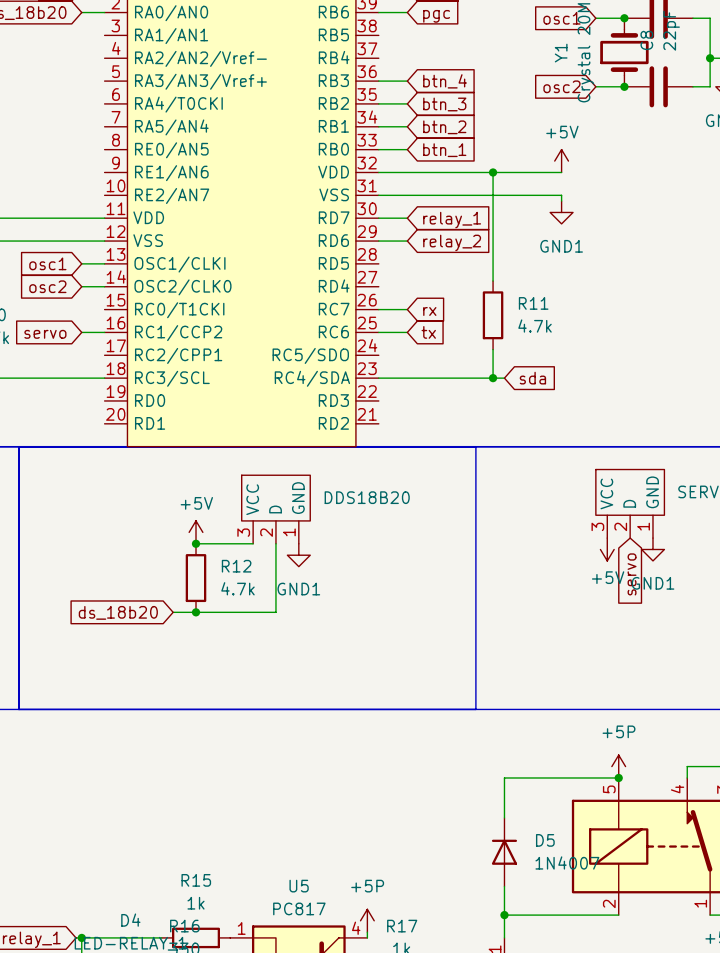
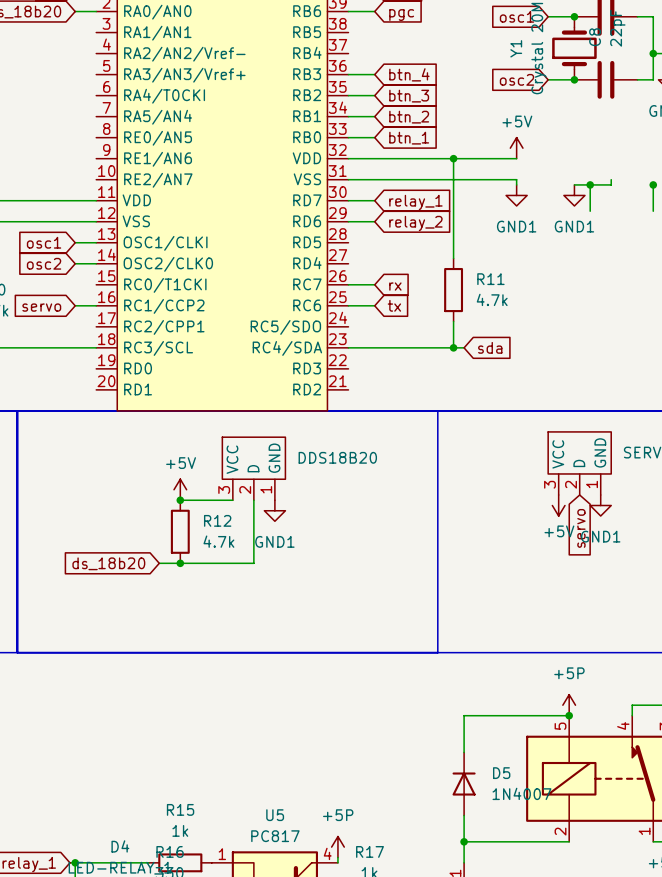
wire: none -> (611, 179) (611, 184) (574, 184)
wire: none -> (590, 184) (590, 211)
junction: none -> (590, 184)
wire: none -> (653, 184) (653, 211)
junction: none -> (653, 184)
power symbol: none -> GND1 (574, 195)

